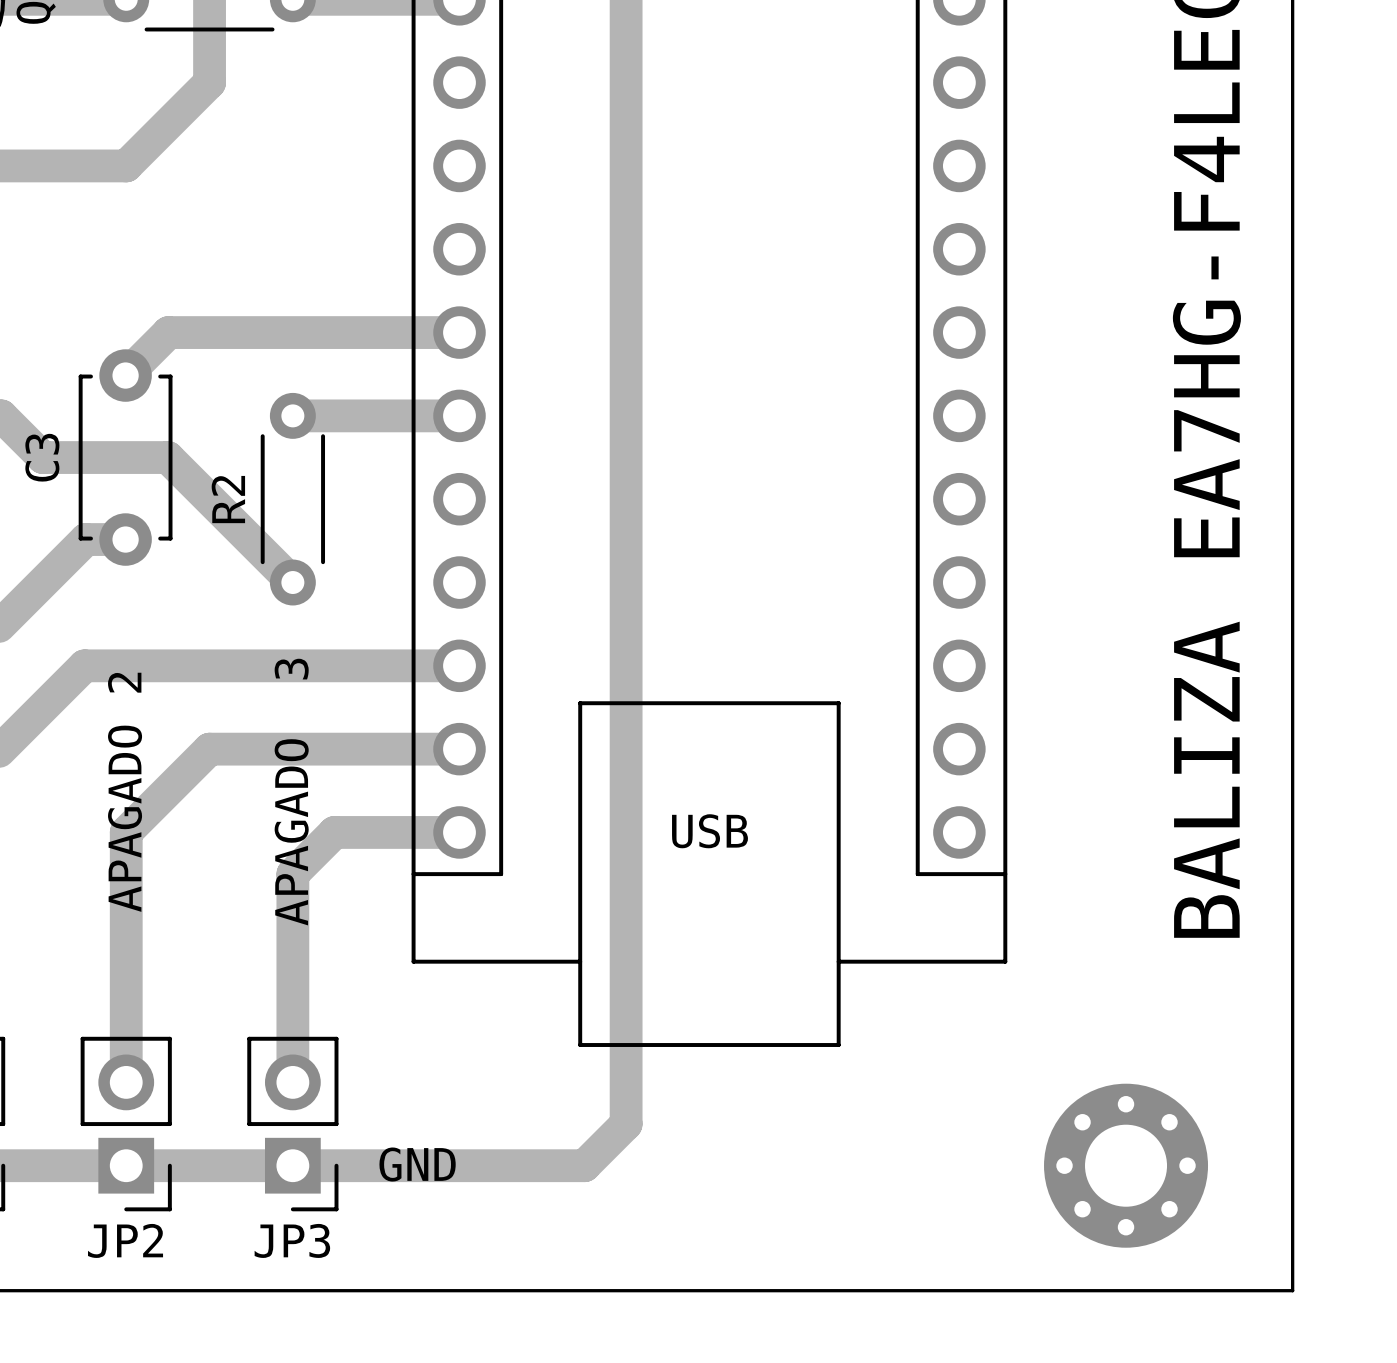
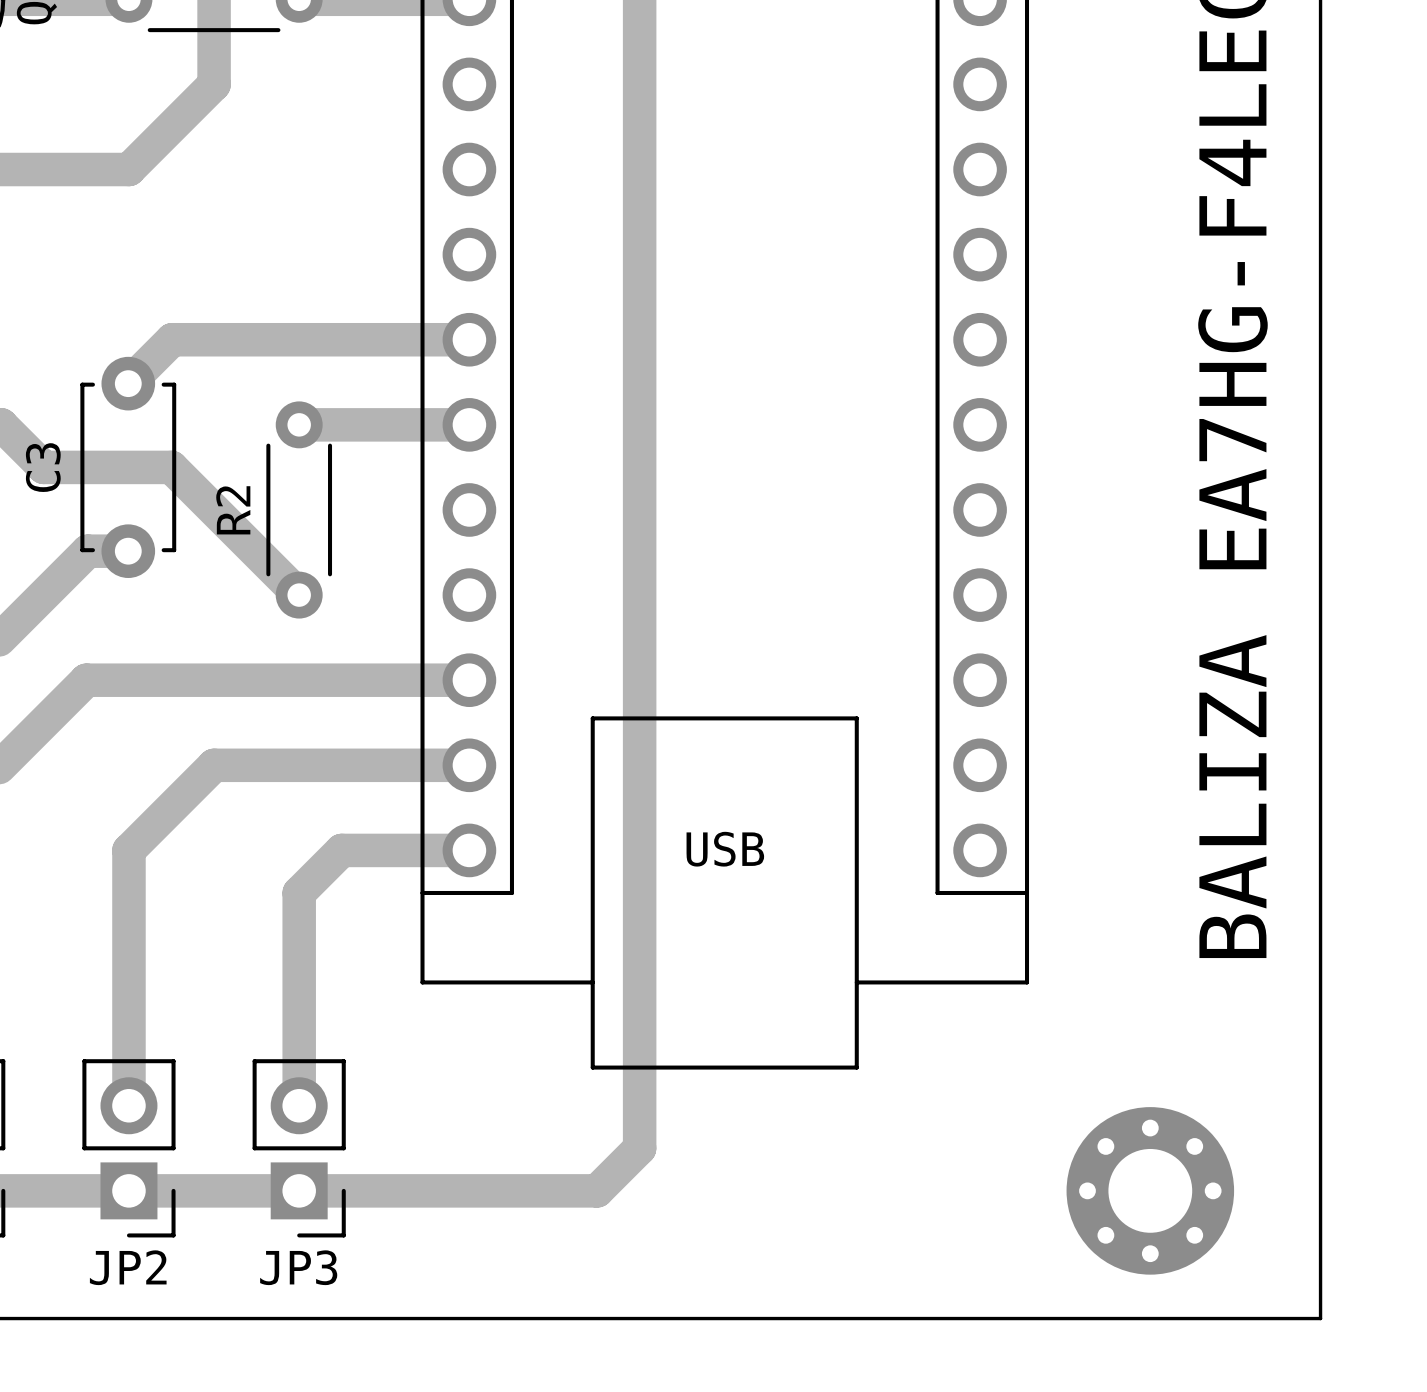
text: APAGADO 2 (125, 792) -> none
text: APAGADO 3 (291, 792) -> none
text: GND (417, 1164) -> none

